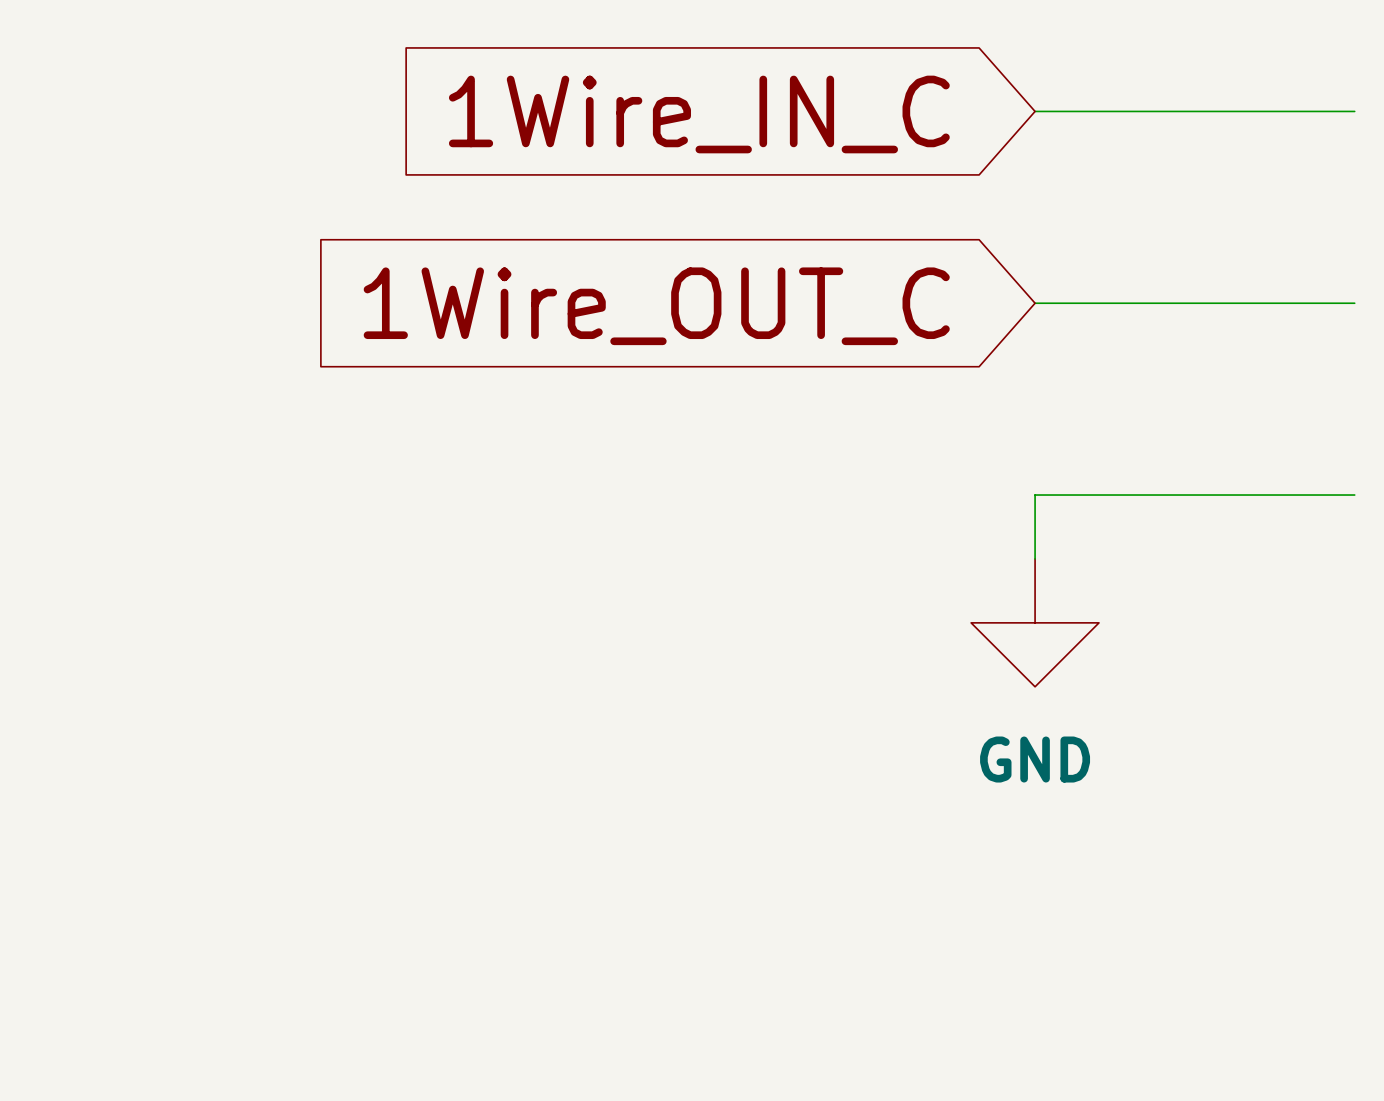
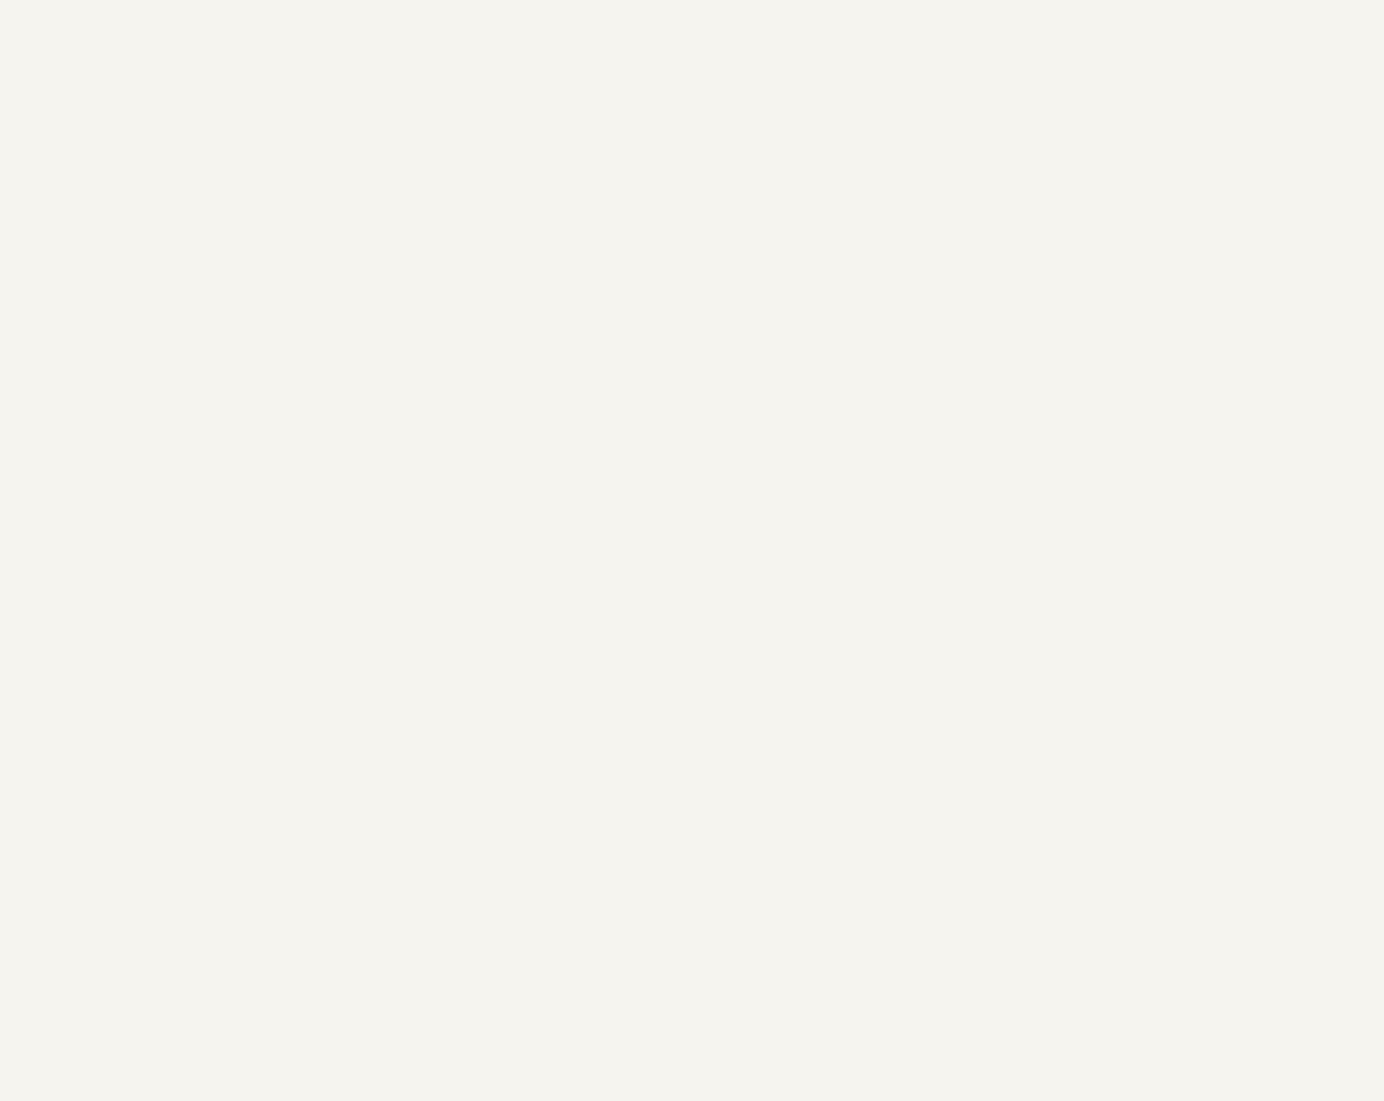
wire: (1035, 111) (1354, 111) -> none
global label: 1Wire_IN_C (699, 114) -> none
wire: (1035, 303) (1354, 303) -> none
global label: 1Wire_OUT_C (656, 306) -> none
wire: (1354, 495) (1035, 495) (1035, 558) -> none
power symbol: GND (1035, 622) -> none

